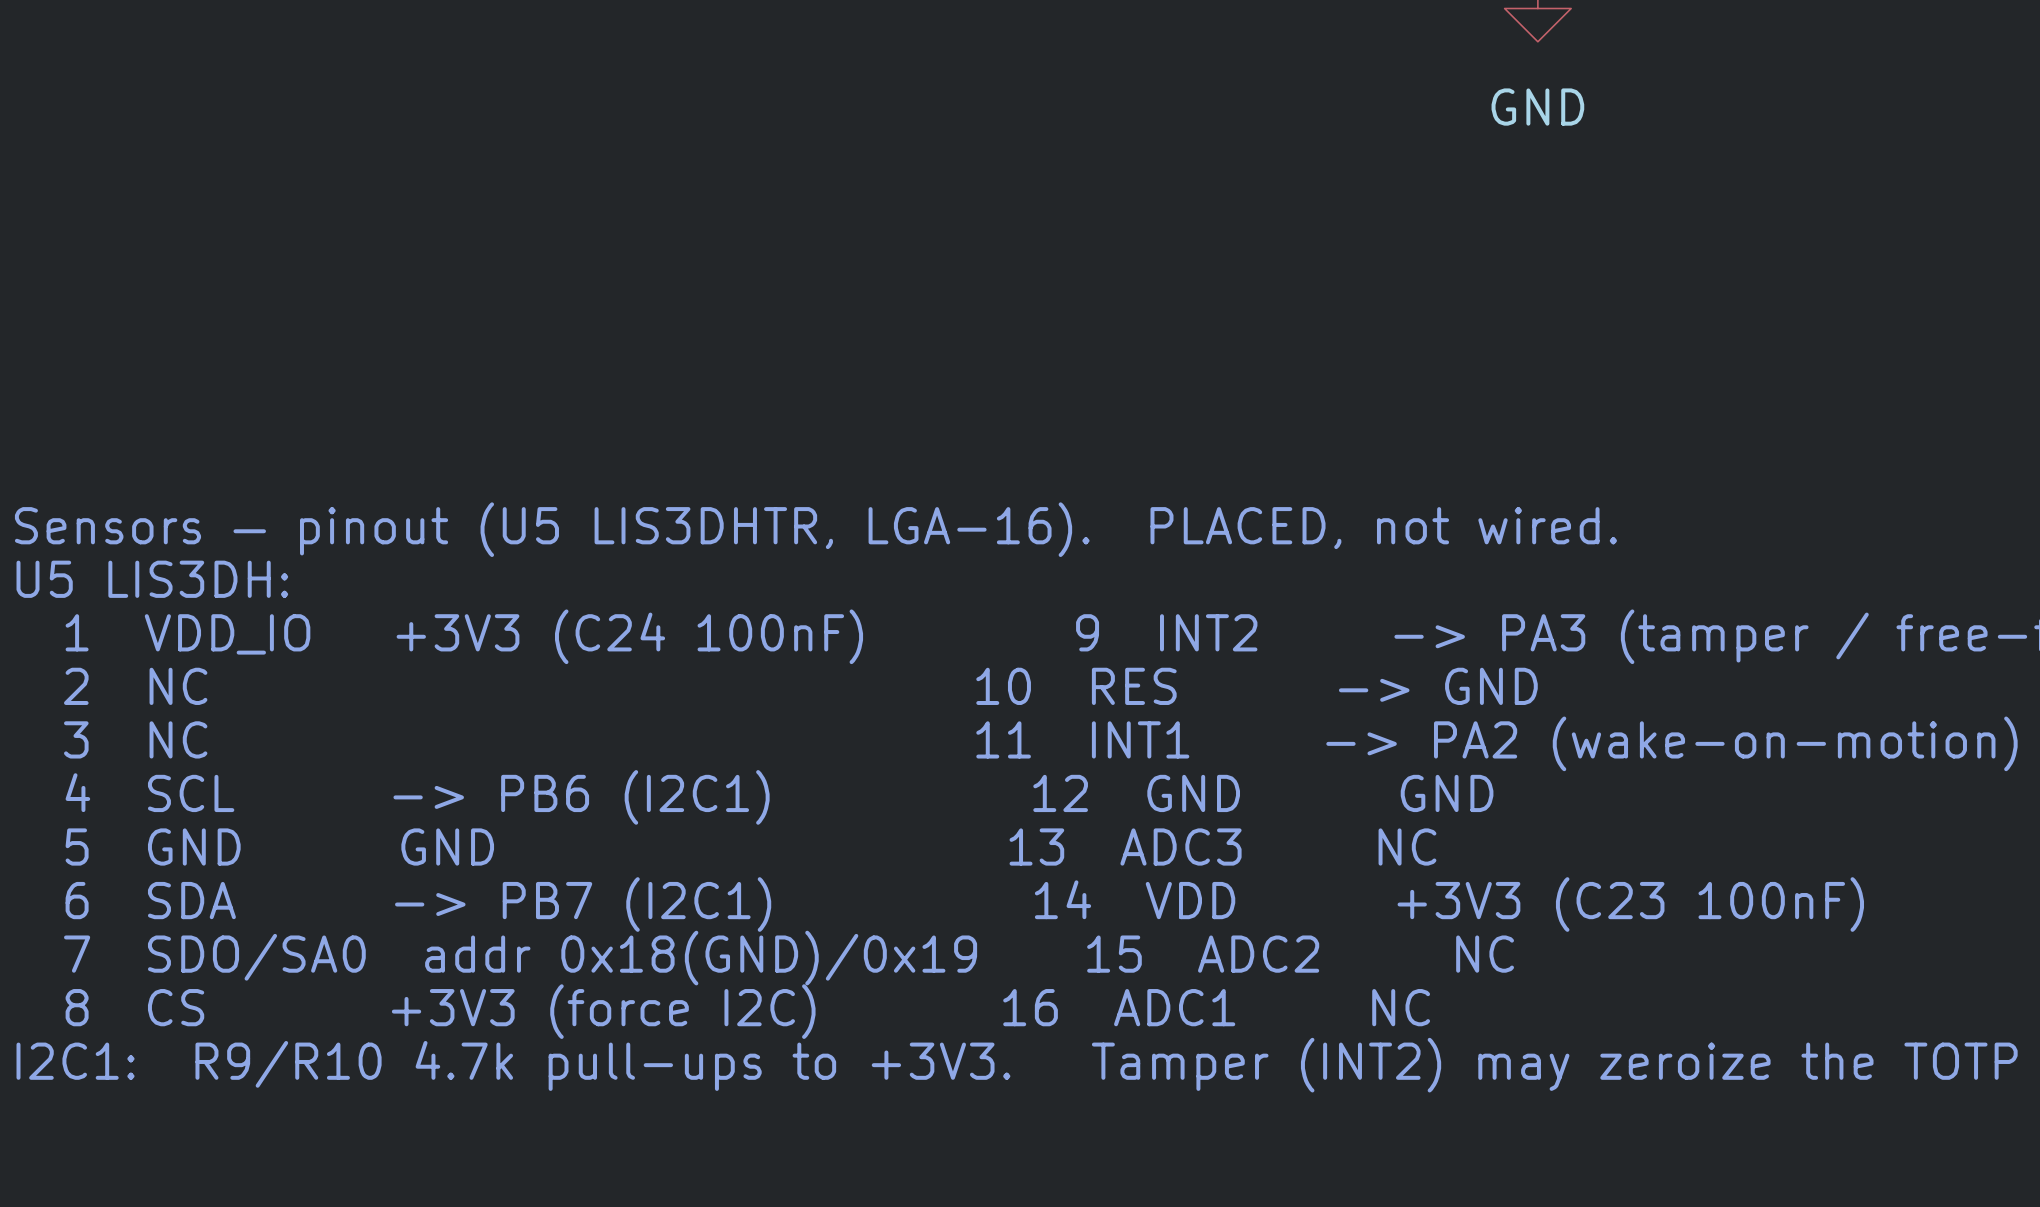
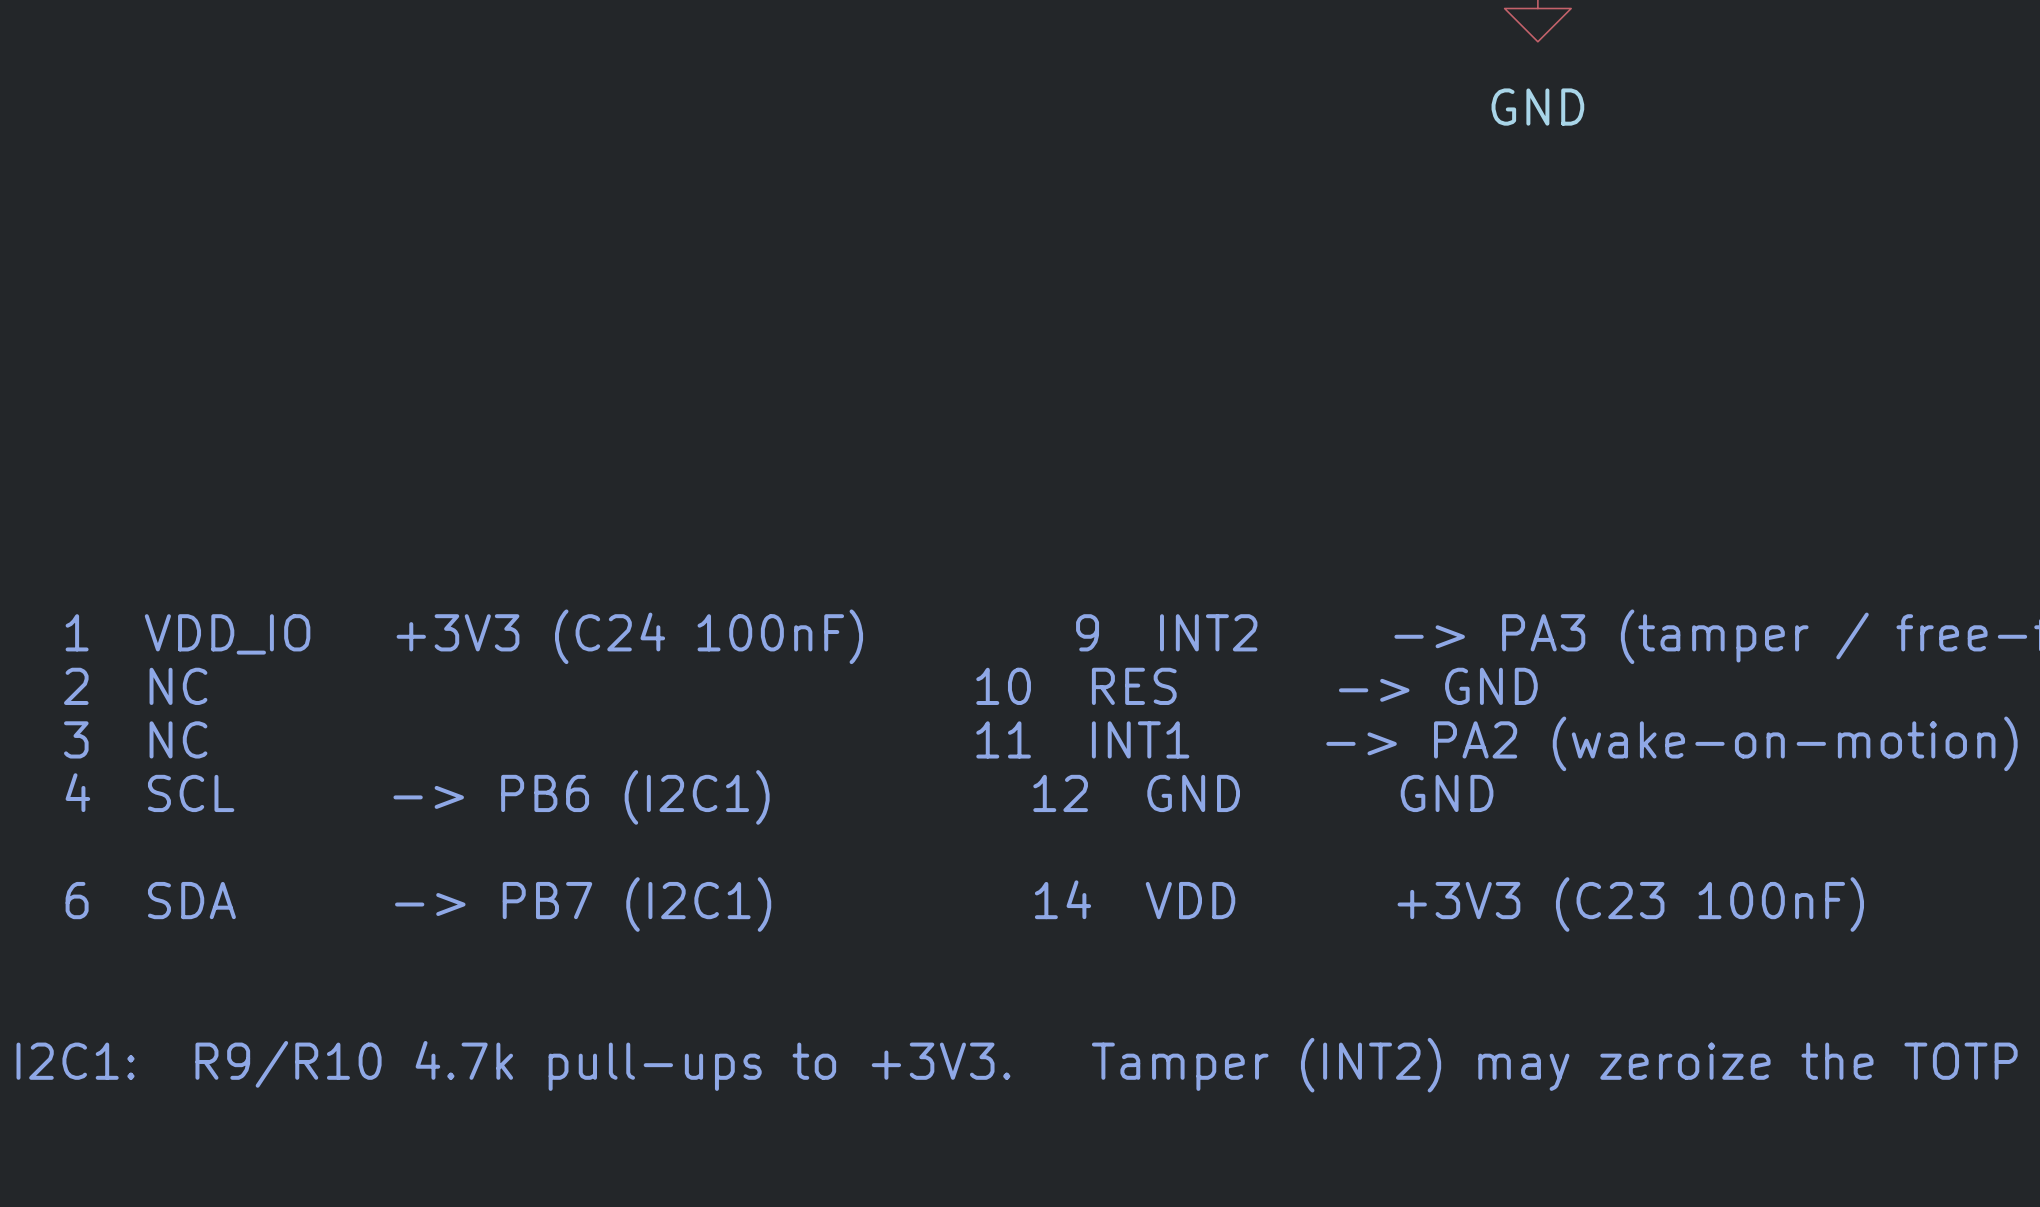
text: Sensors — pinout (U5 LIS3DHTR, LGA-16). PLACED, not wired. (815, 529) -> none
text: U5 LIS3DH: (152, 579) -> none
text: 5 GND GND 13 ADC3 NC (750, 847) -> none
text: 7 SDO/SA0 addr 0x18(GND)/0x19 15 ADC2 NC (789, 958) -> none
text: 8 CS +3V3 (force I2C) 16 ADC1 NC (747, 1011) -> none

